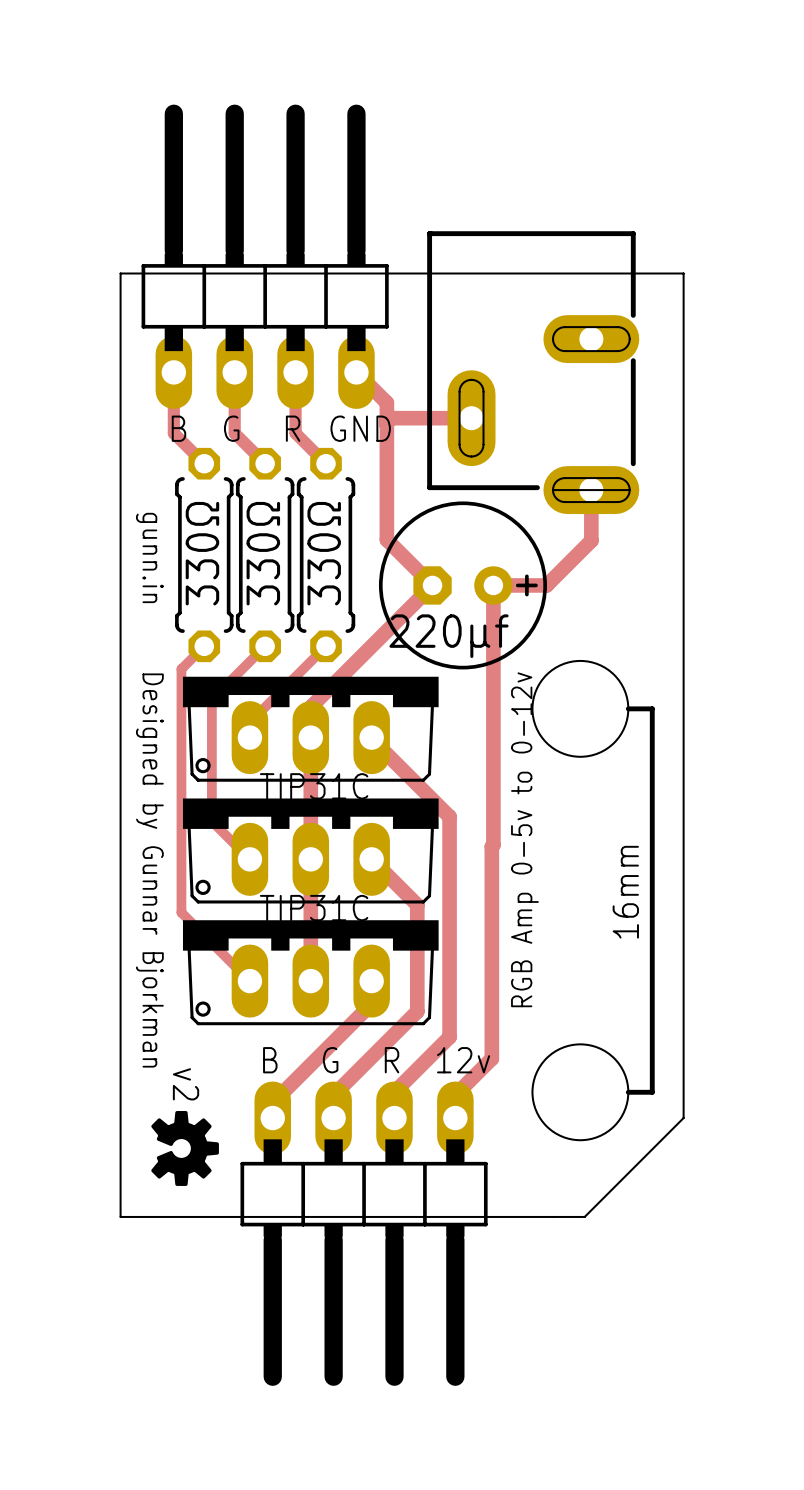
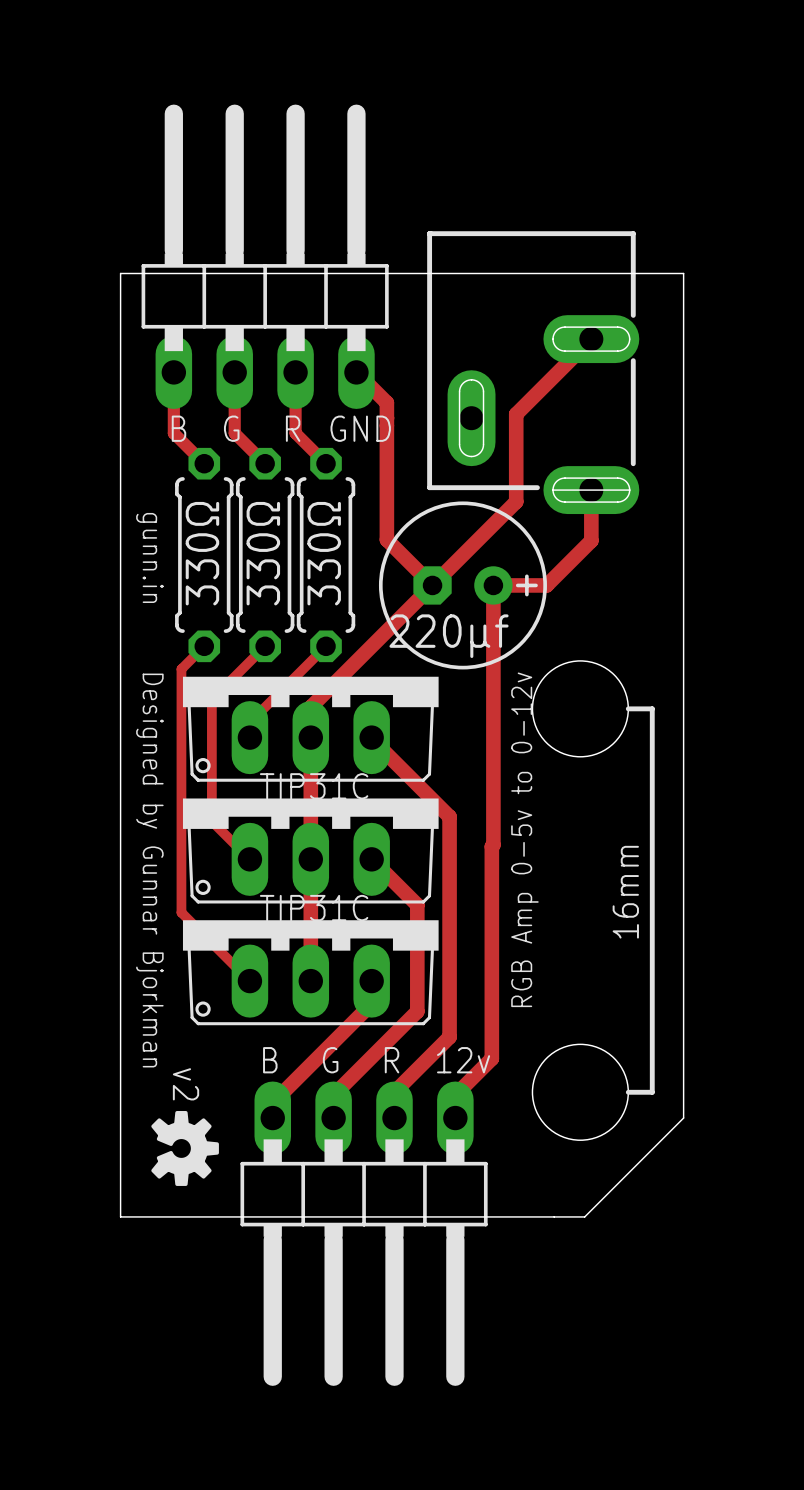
top track: none -> (591, 339) (516, 414) (516, 501) (432, 585)
top track: (387, 418) (471, 418) -> none

